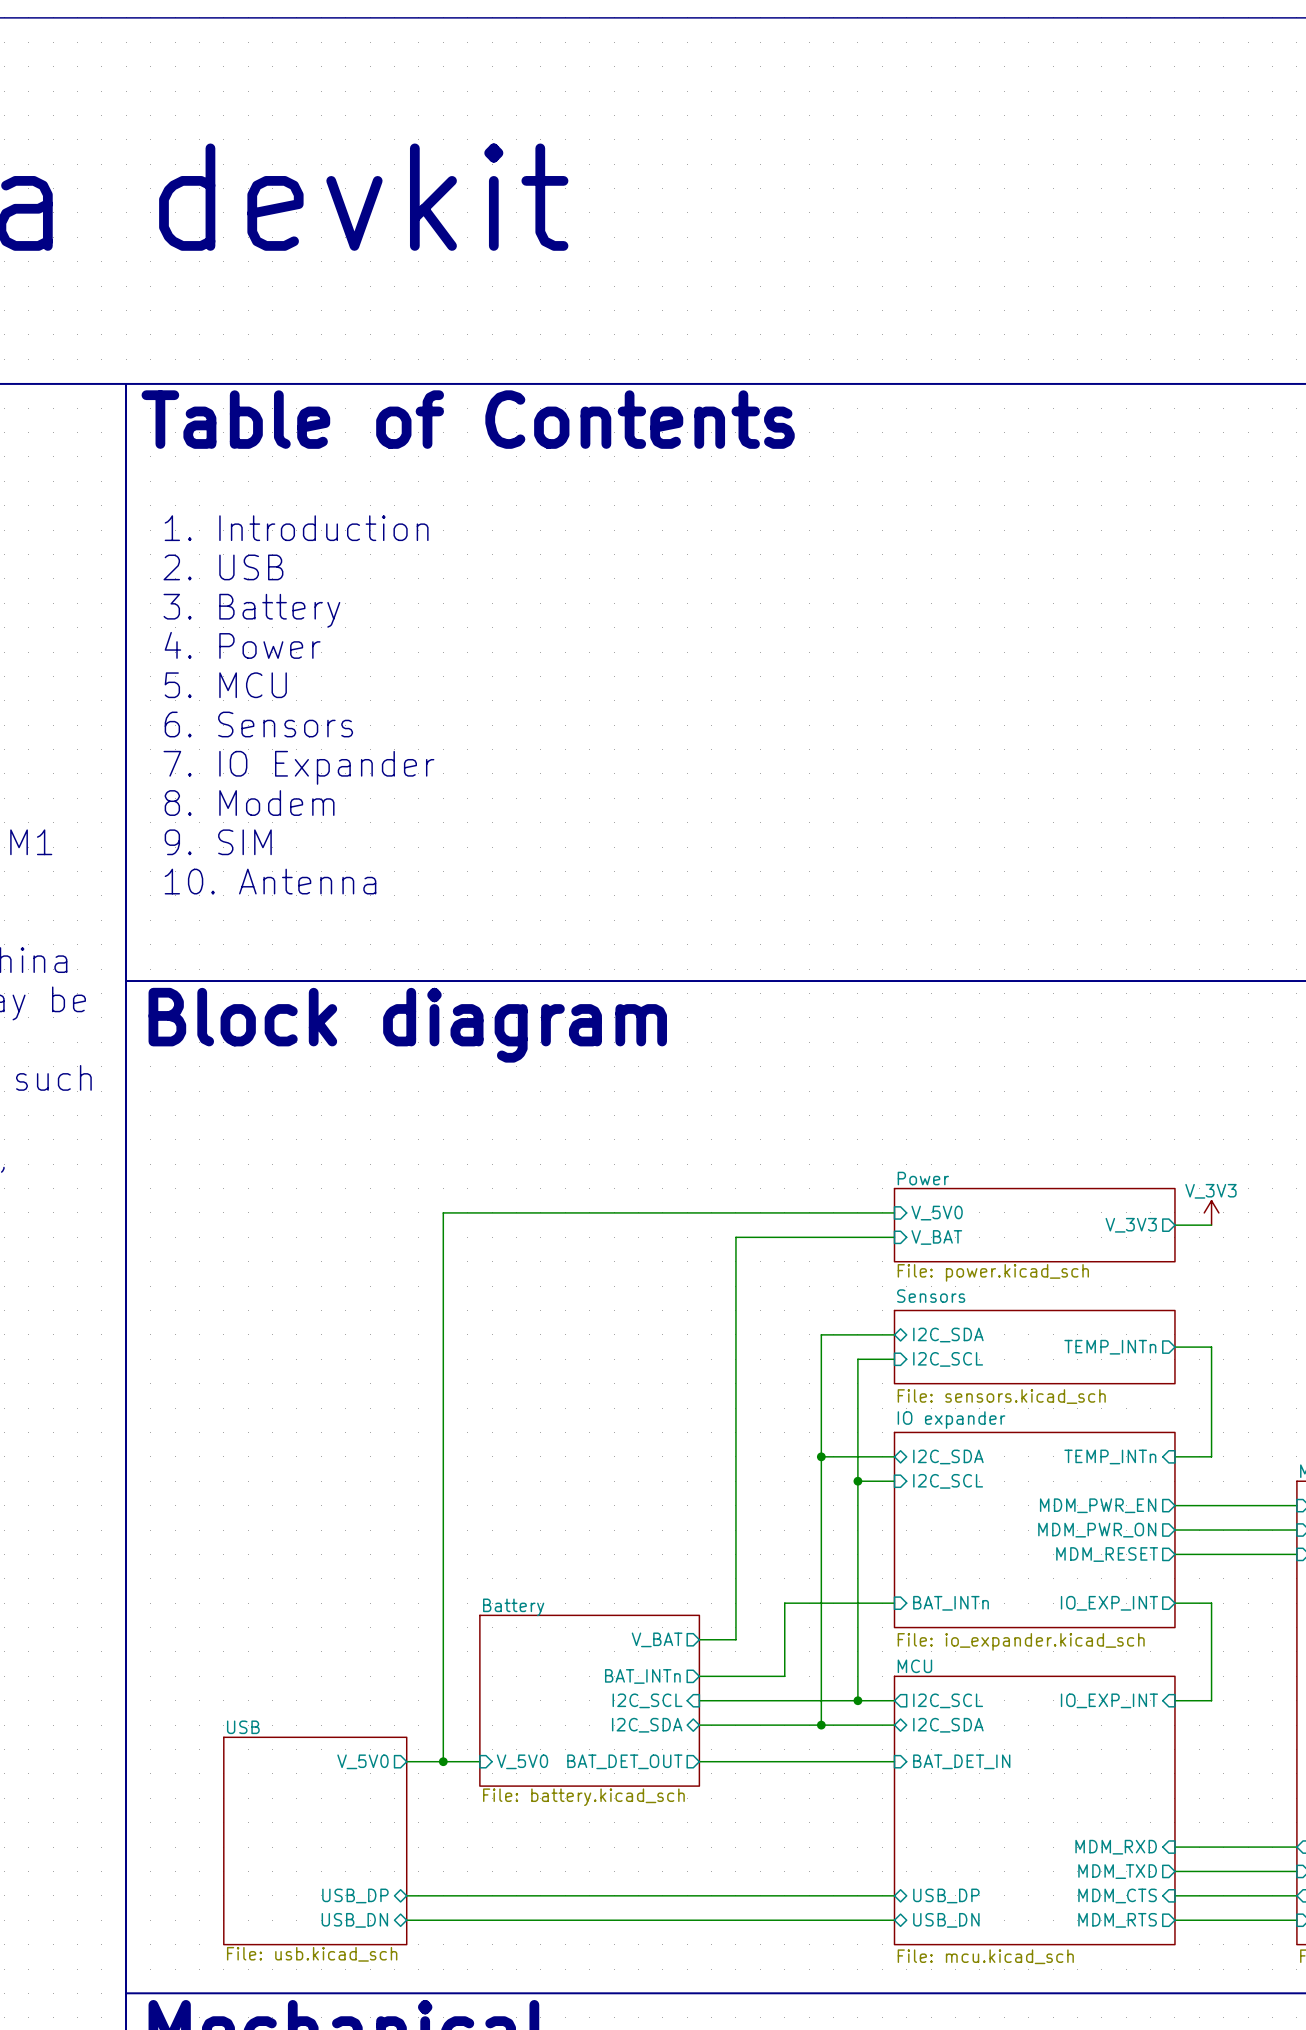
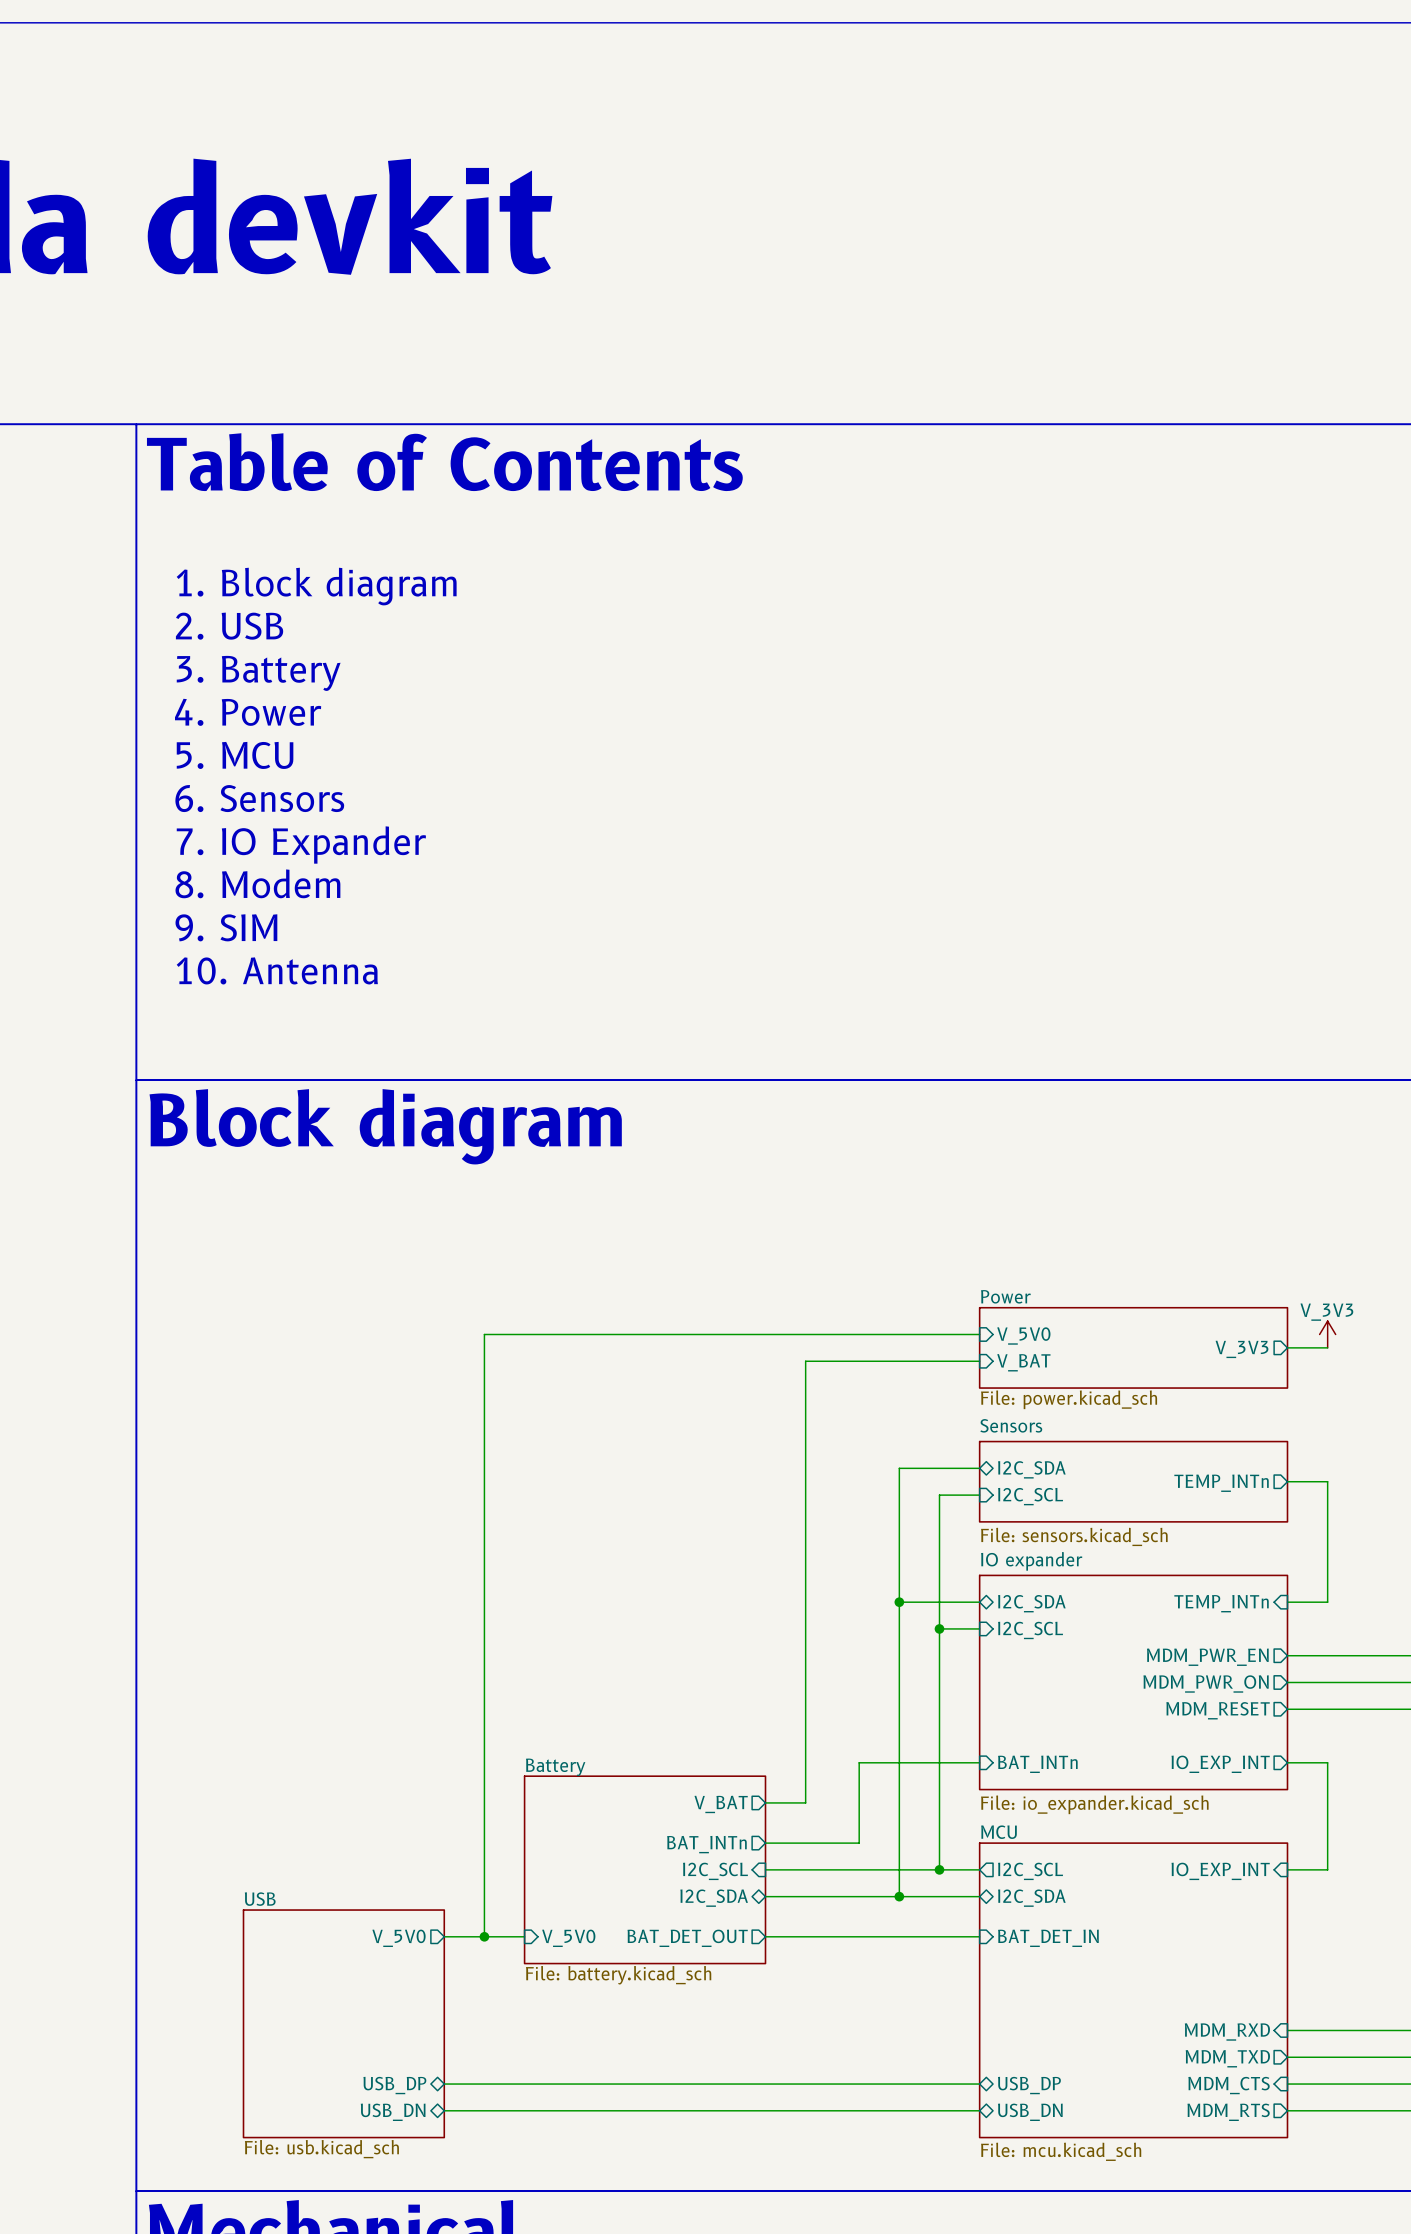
text: 1. Introduction (296, 528) -> 1. Block diagram (316, 586)

